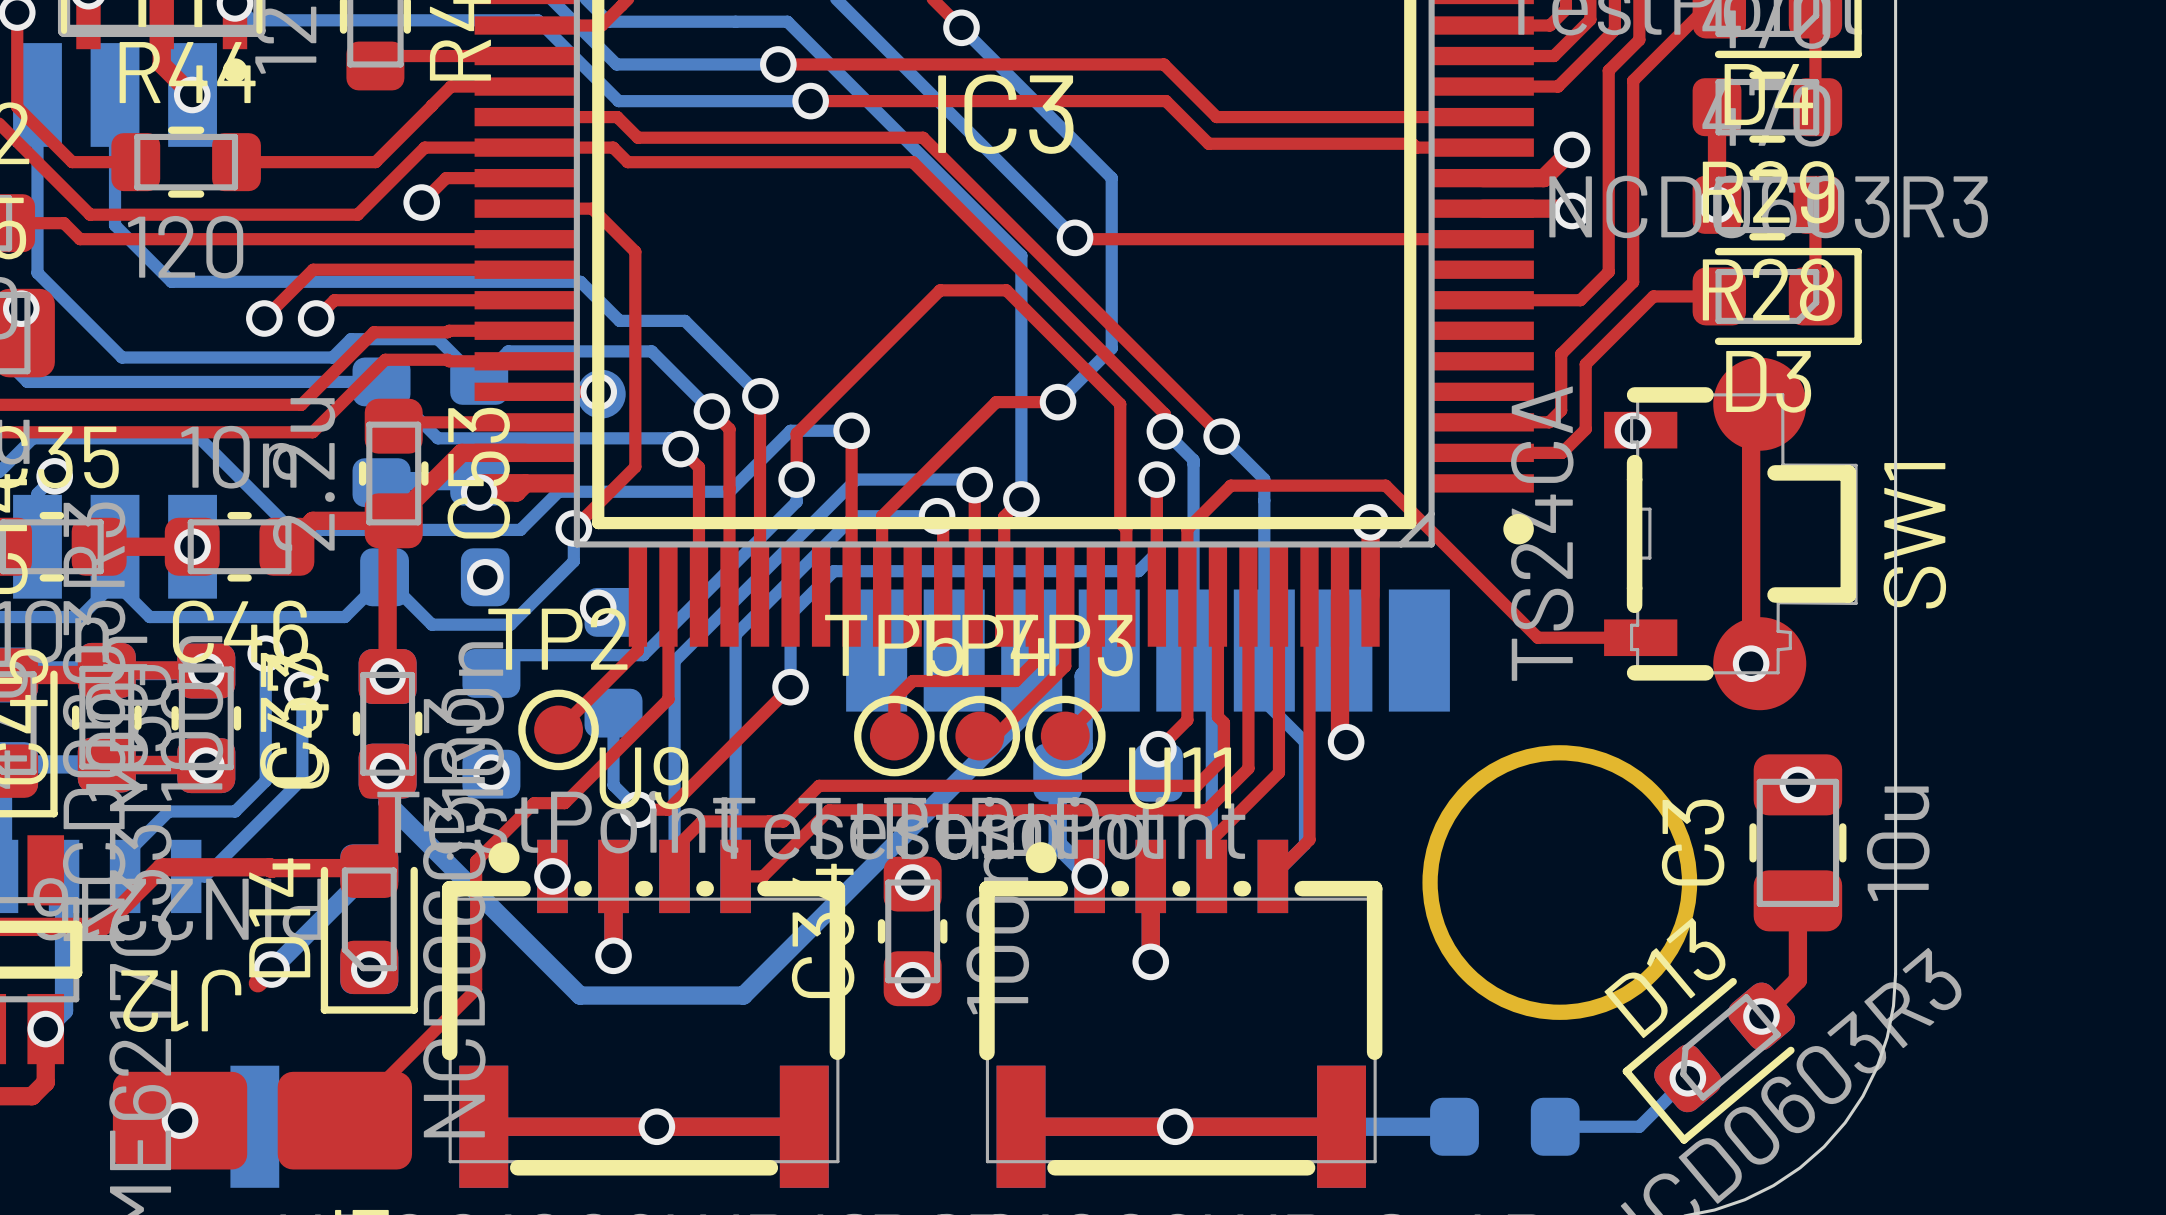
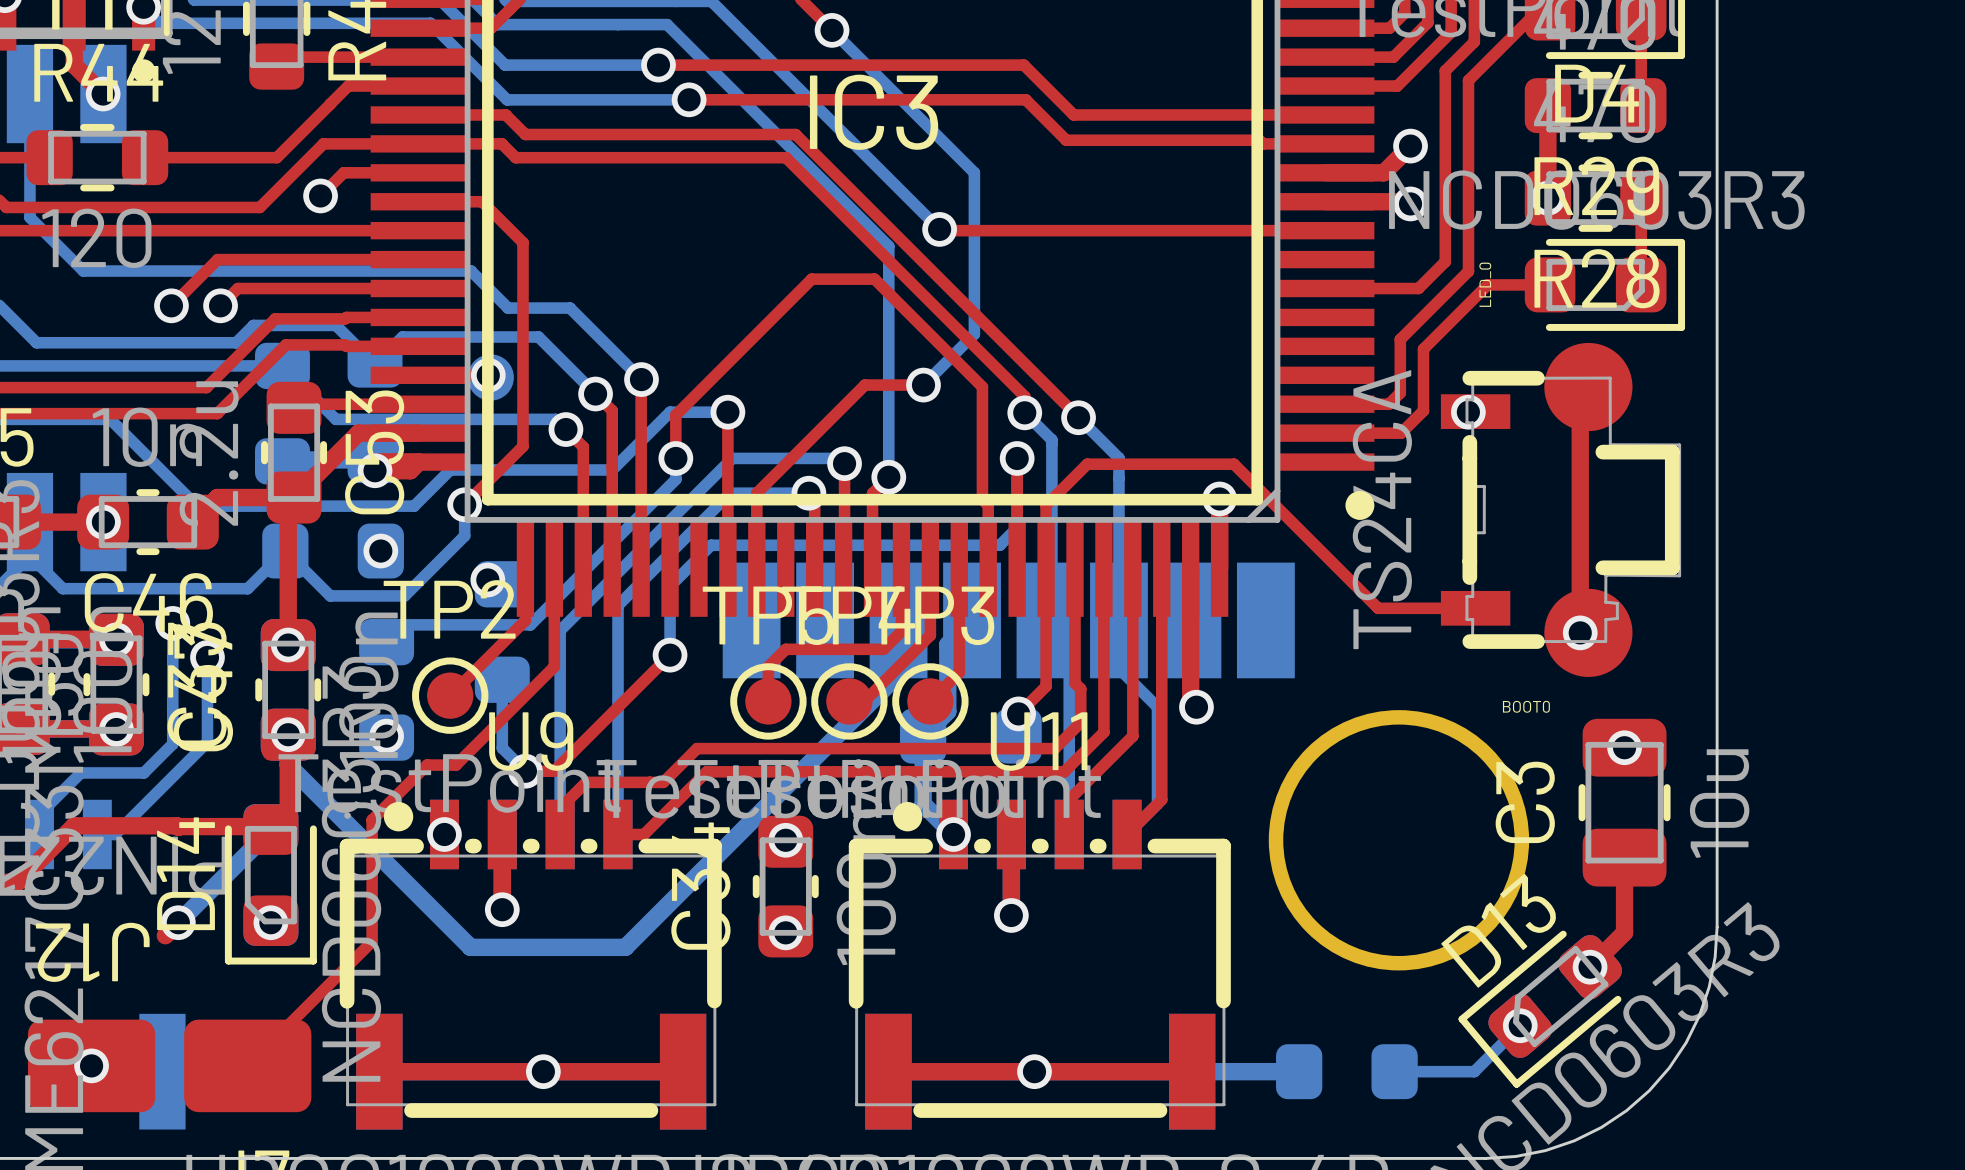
D3 name: D3 (1768, 381) -> LED_0 (1485, 284)
SW1 name: SW1 (1914, 535) -> BOOT0 (1526, 706)

